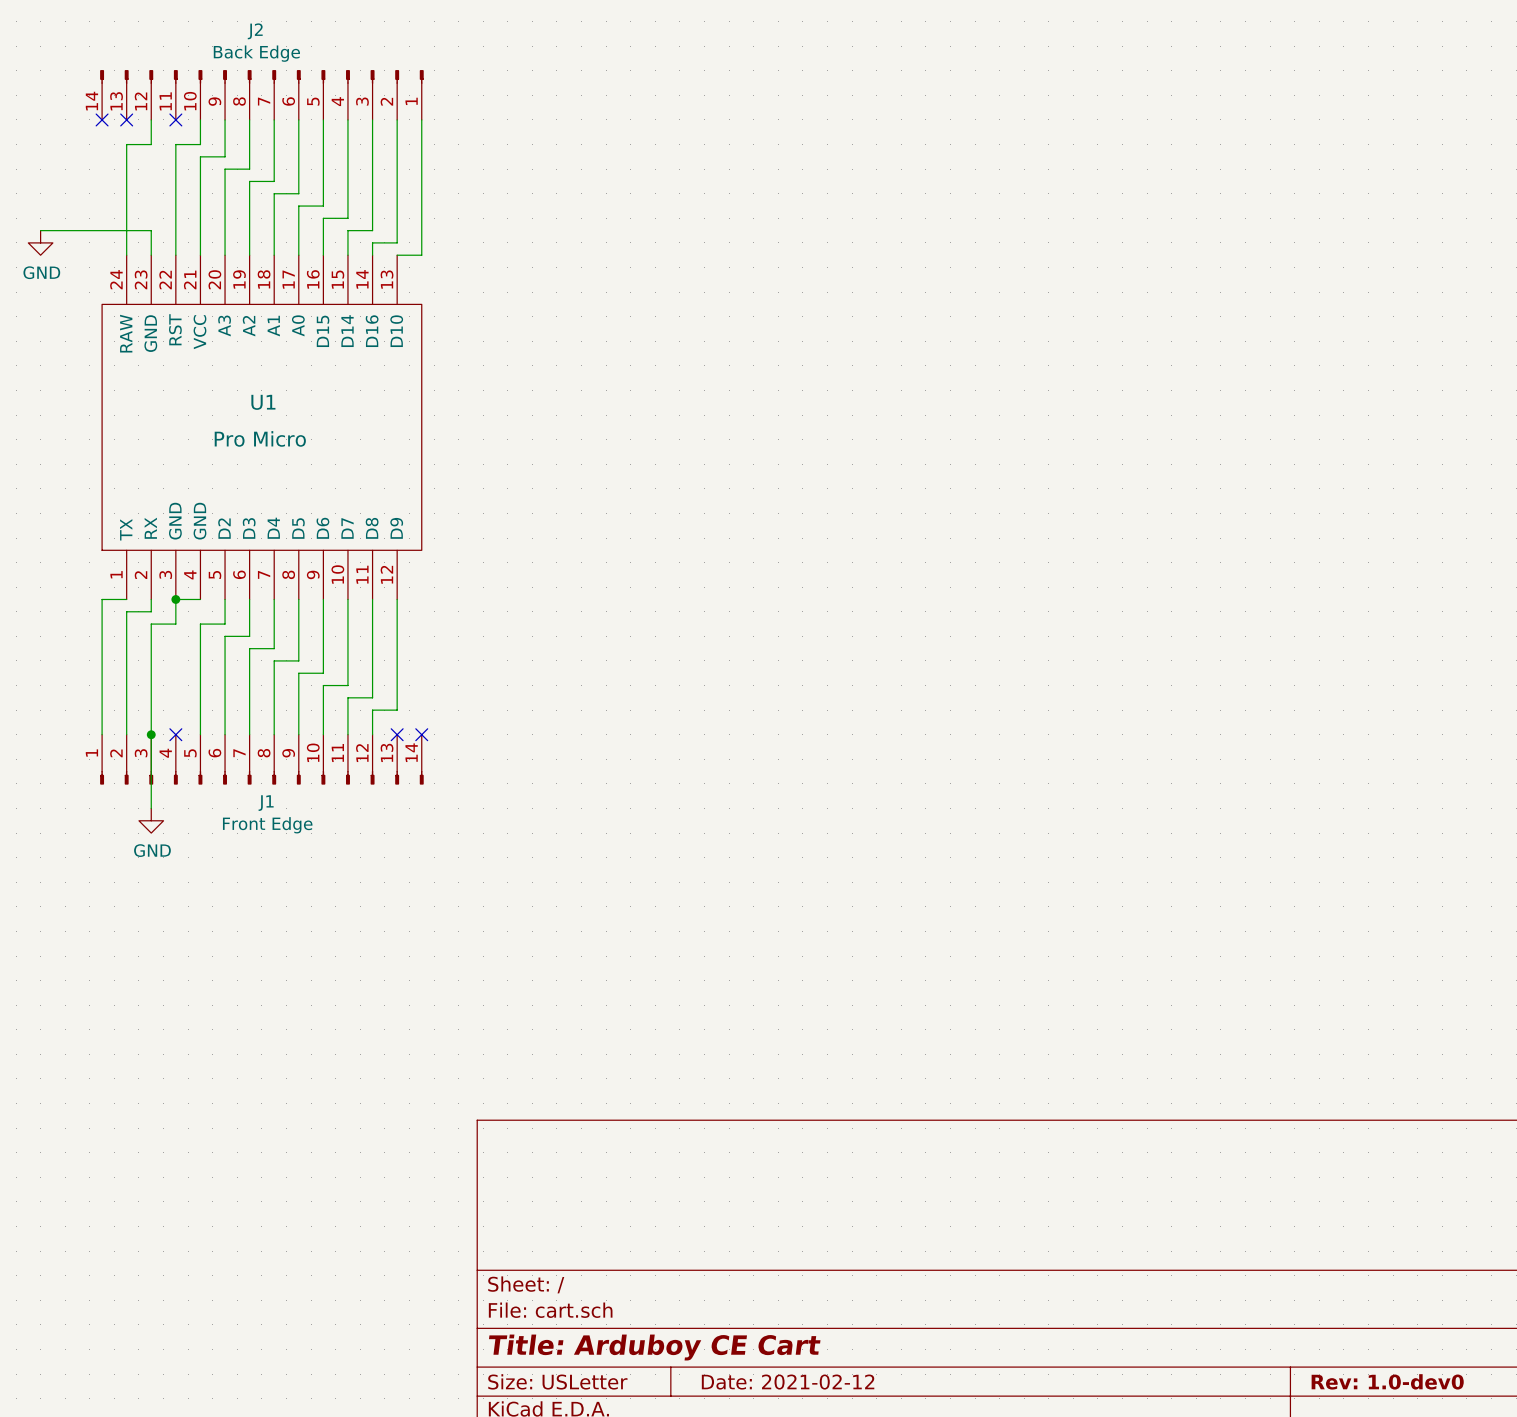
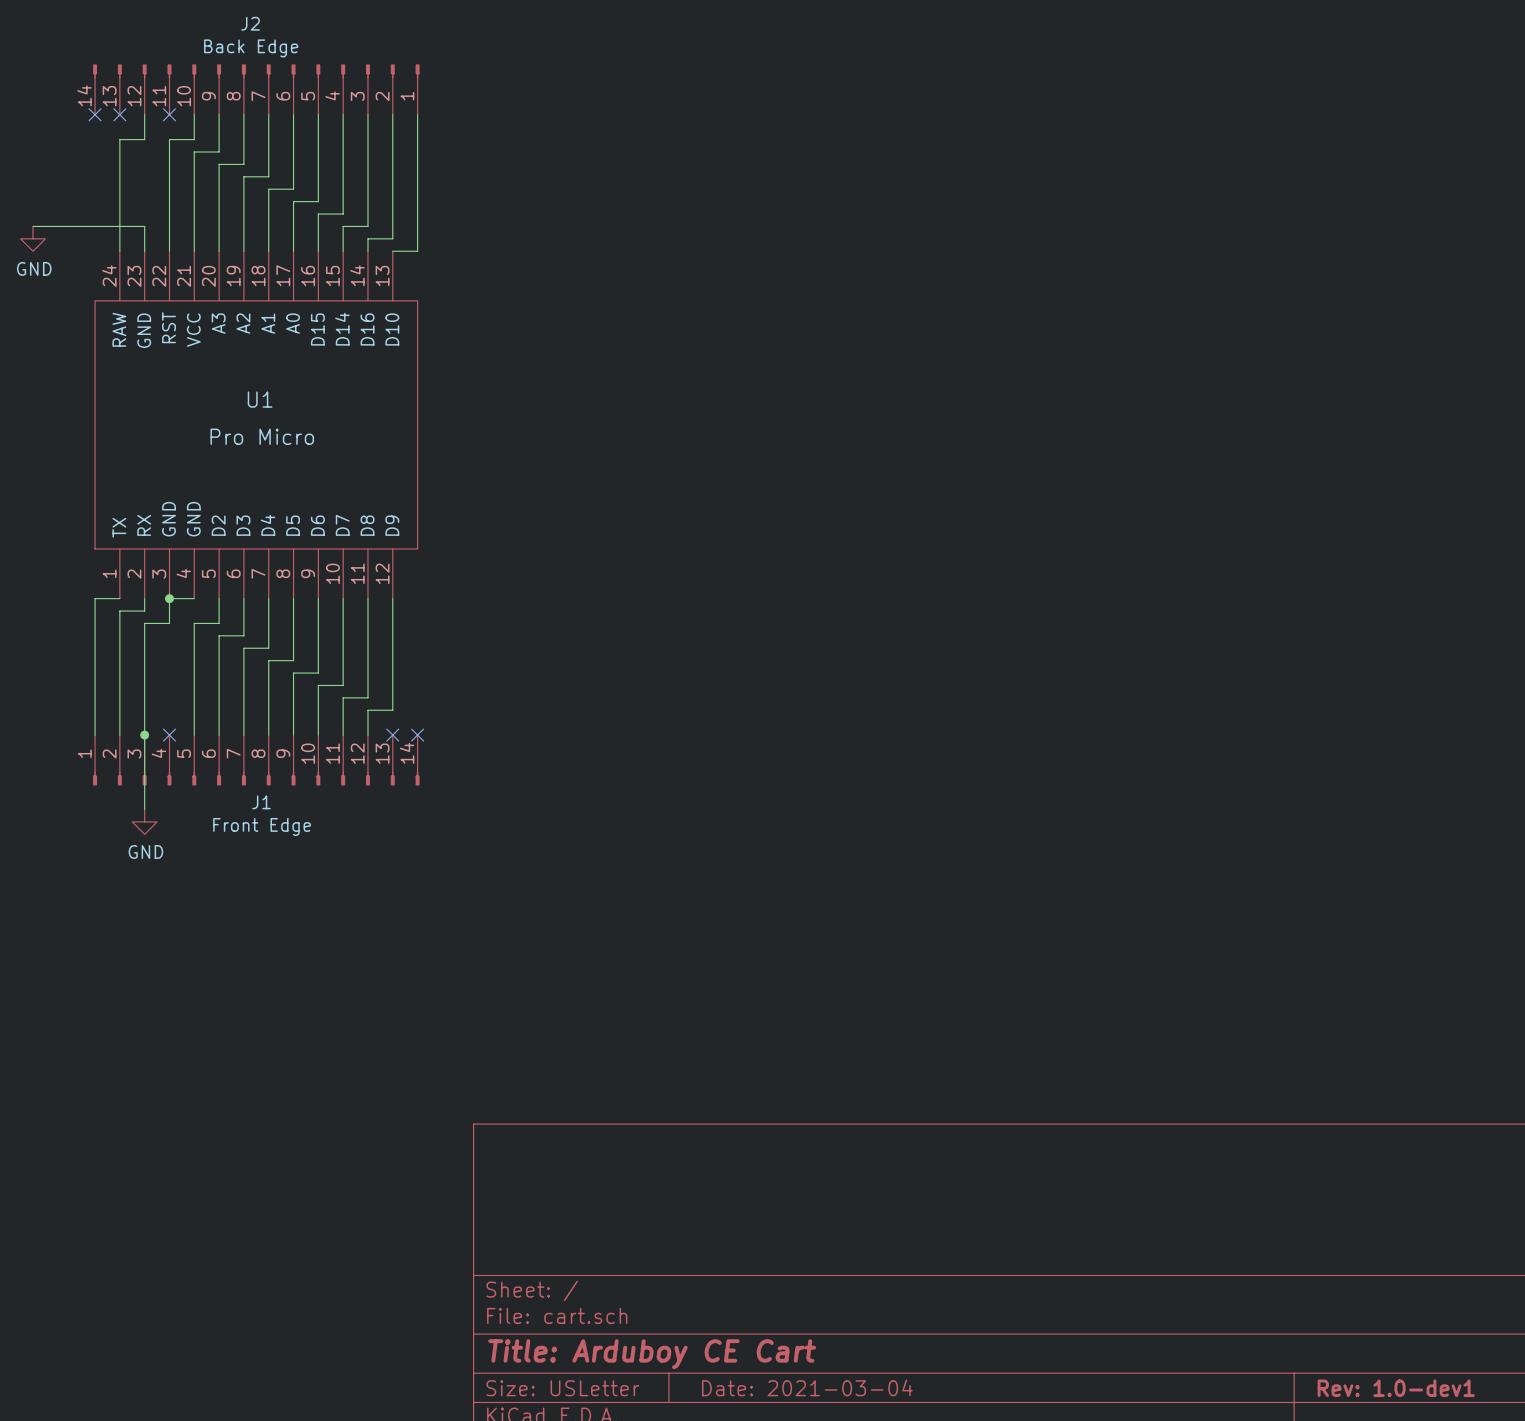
title block: Rev: 1.0-dev0 (1387, 1381) -> Rev: 1.0-dev1 (1396, 1388)
title block: Date: 2021-02-12 (788, 1382) -> Date: 2021-03-04 (807, 1387)

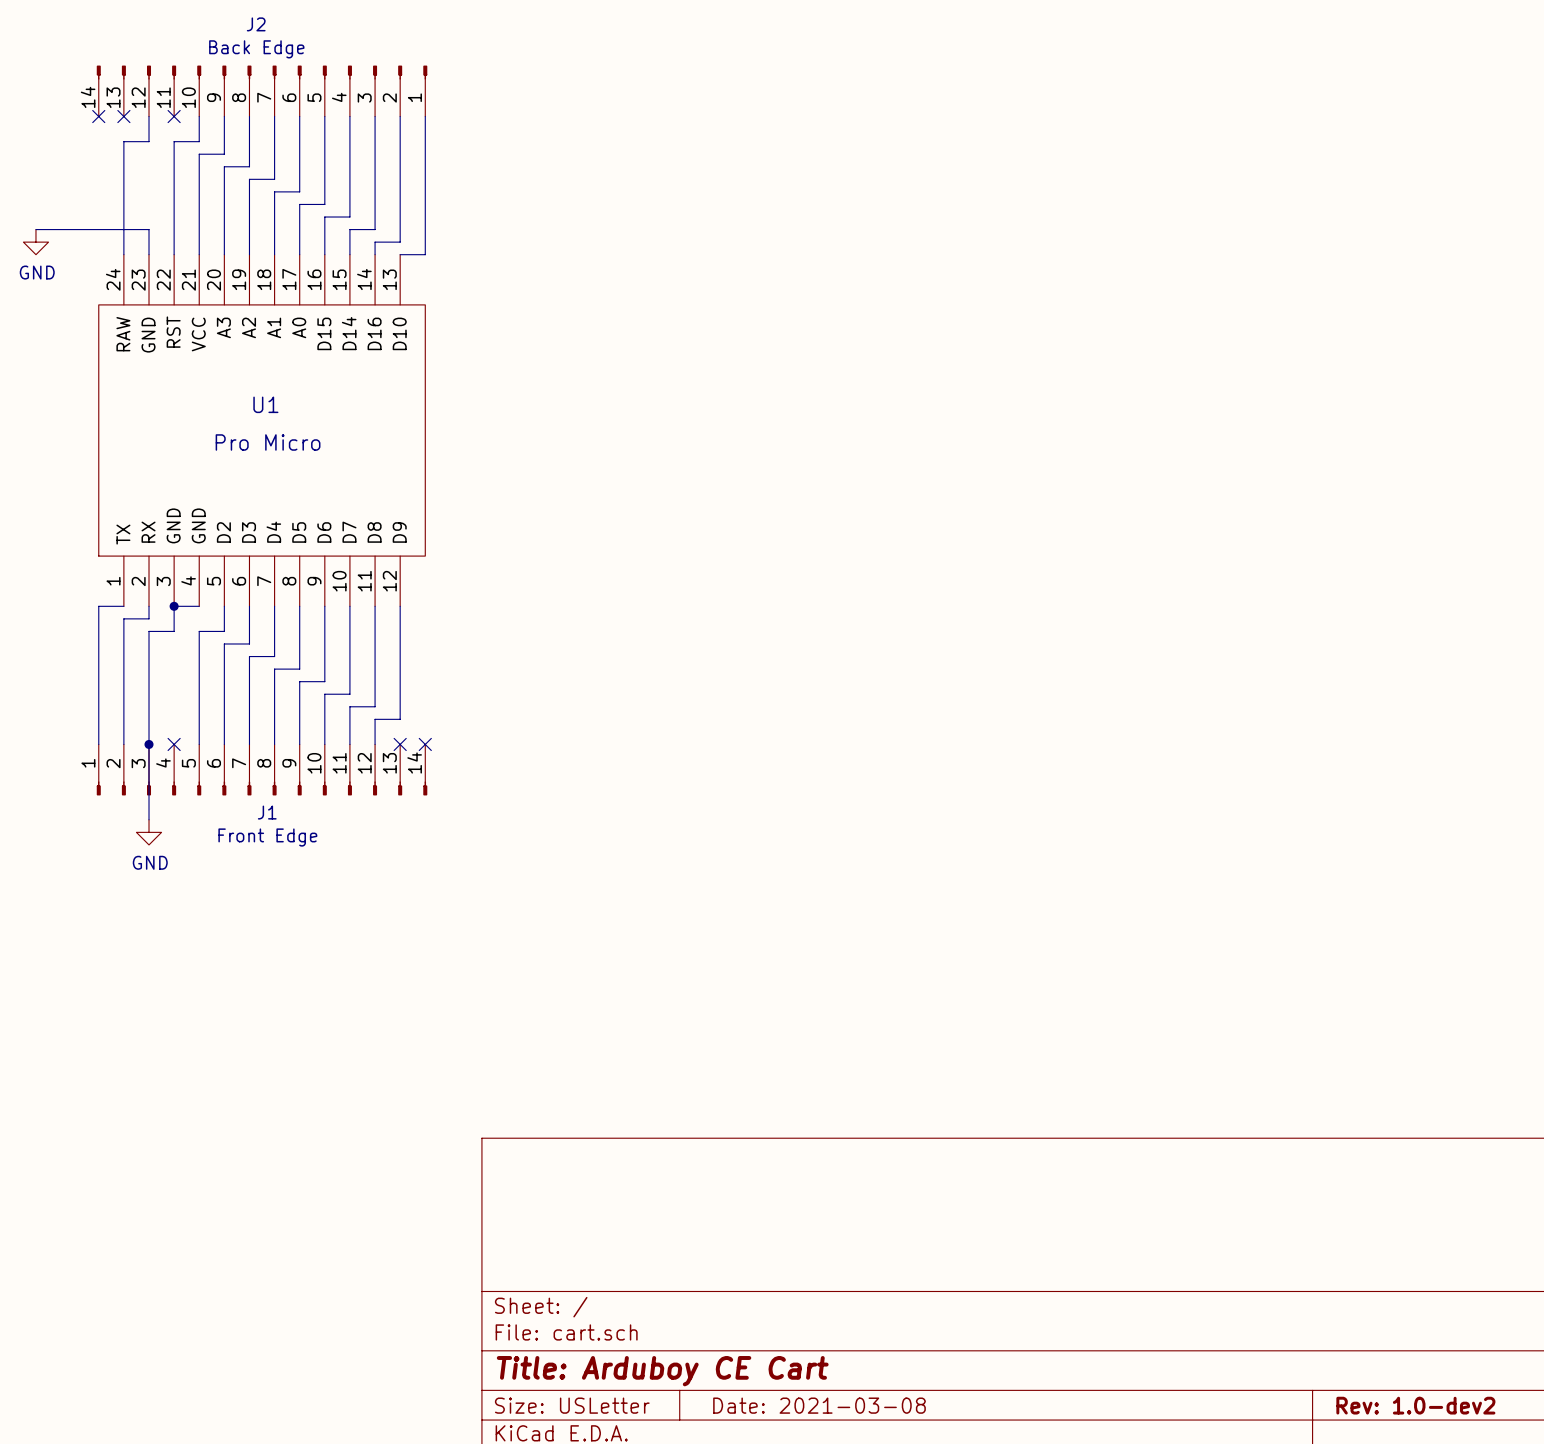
title block: Date: 2021-03-04 (807, 1387) -> Date: 2021-03-08 (819, 1405)
title block: Rev: 1.0-dev1 (1396, 1388) -> Rev: 1.0-dev2 (1415, 1405)

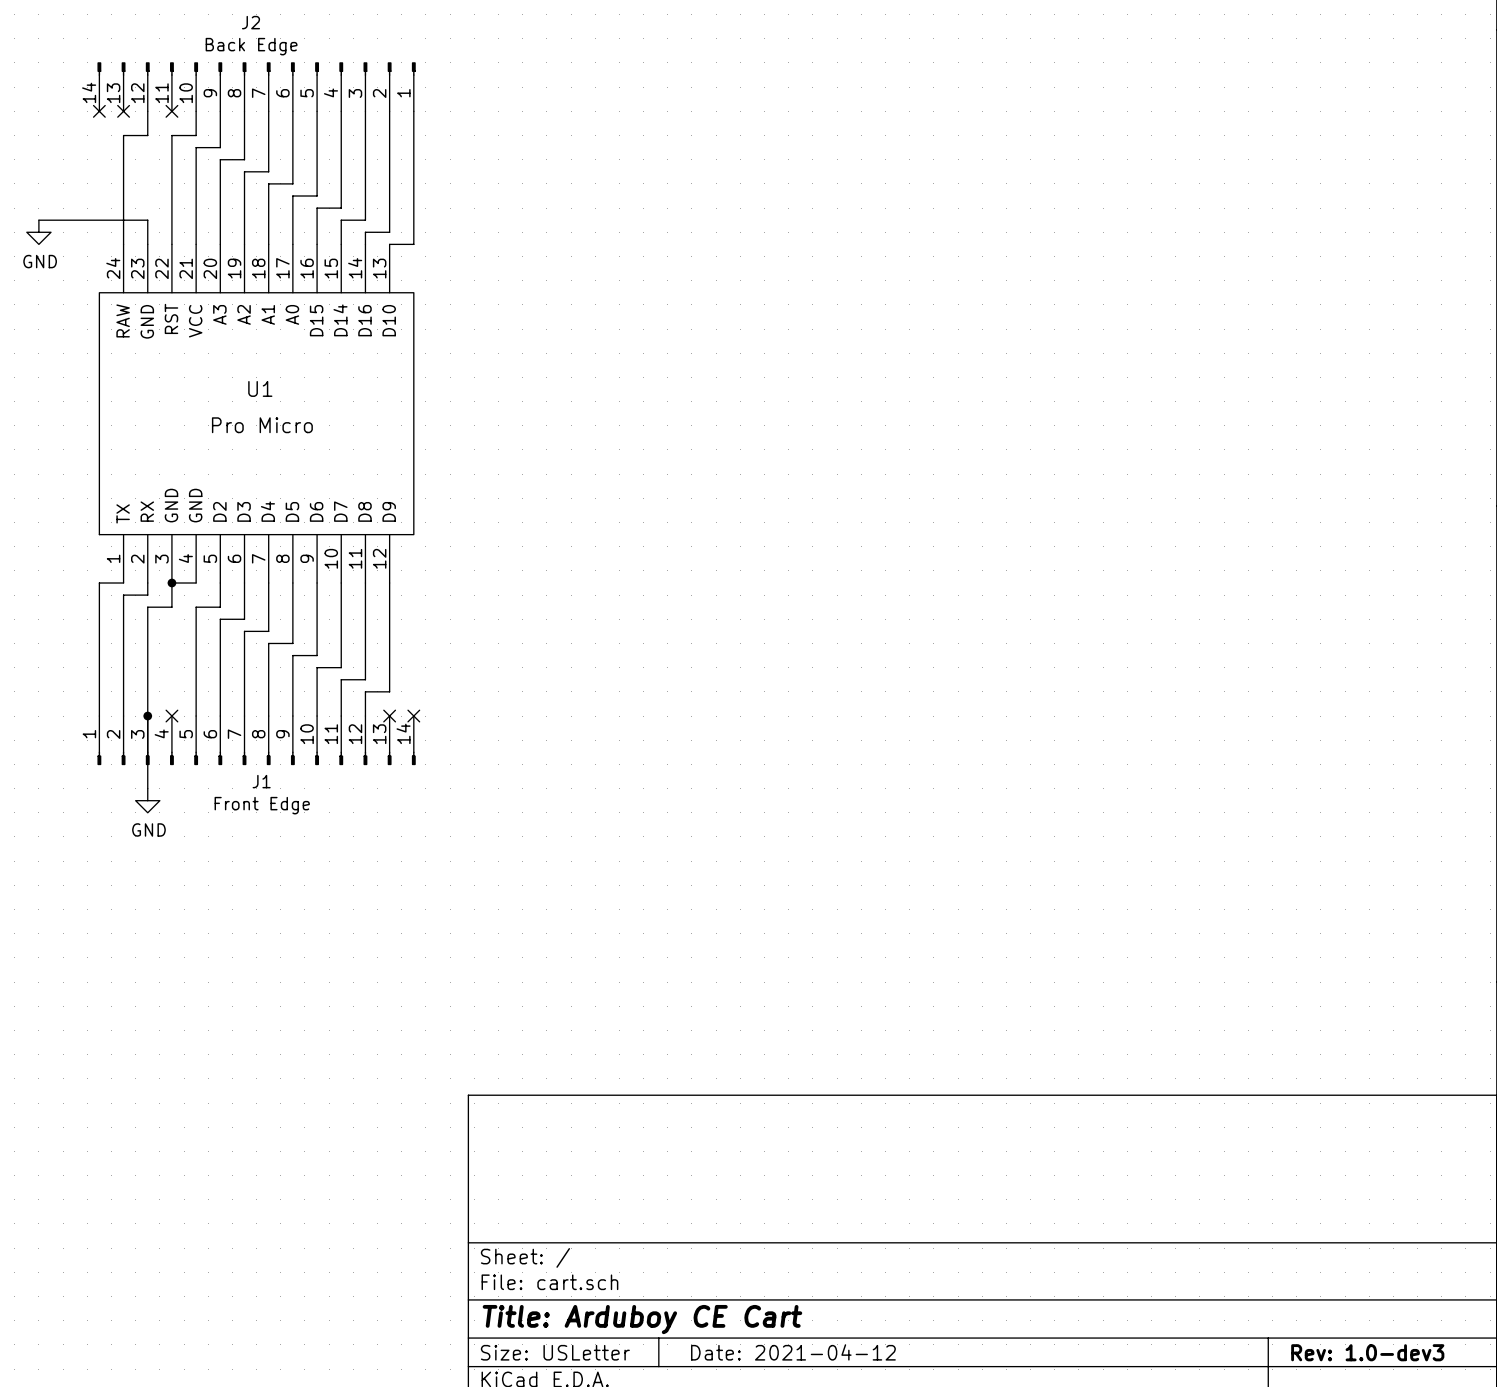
title block: Date: 2021-03-08 (819, 1405) -> Date: 2021-04-12 (793, 1352)
title block: Rev: 1.0-dev2 (1415, 1405) -> Rev: 1.0-dev3 (1367, 1352)

